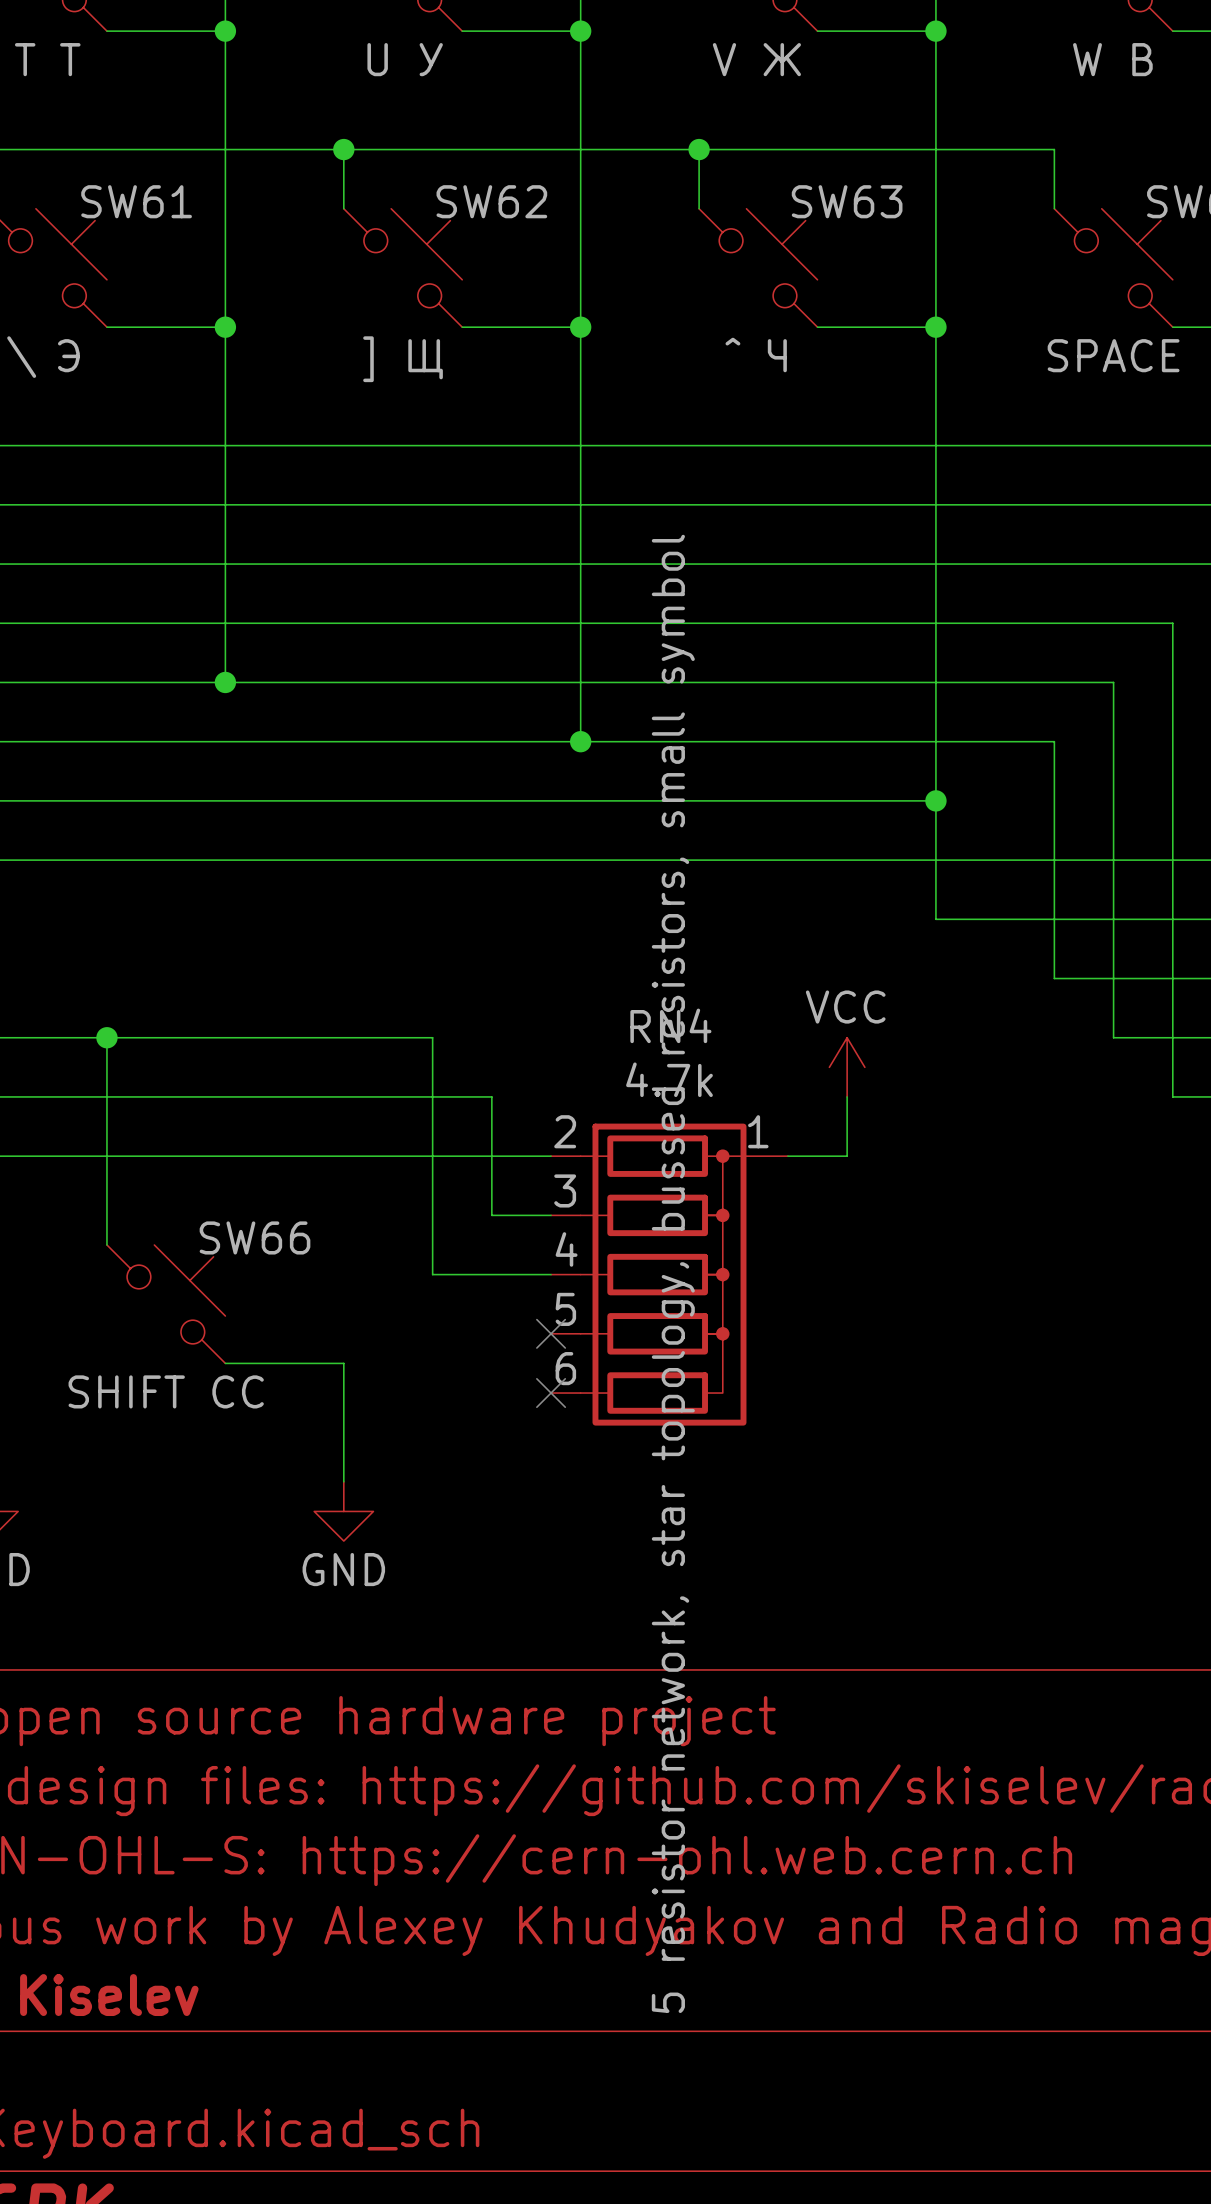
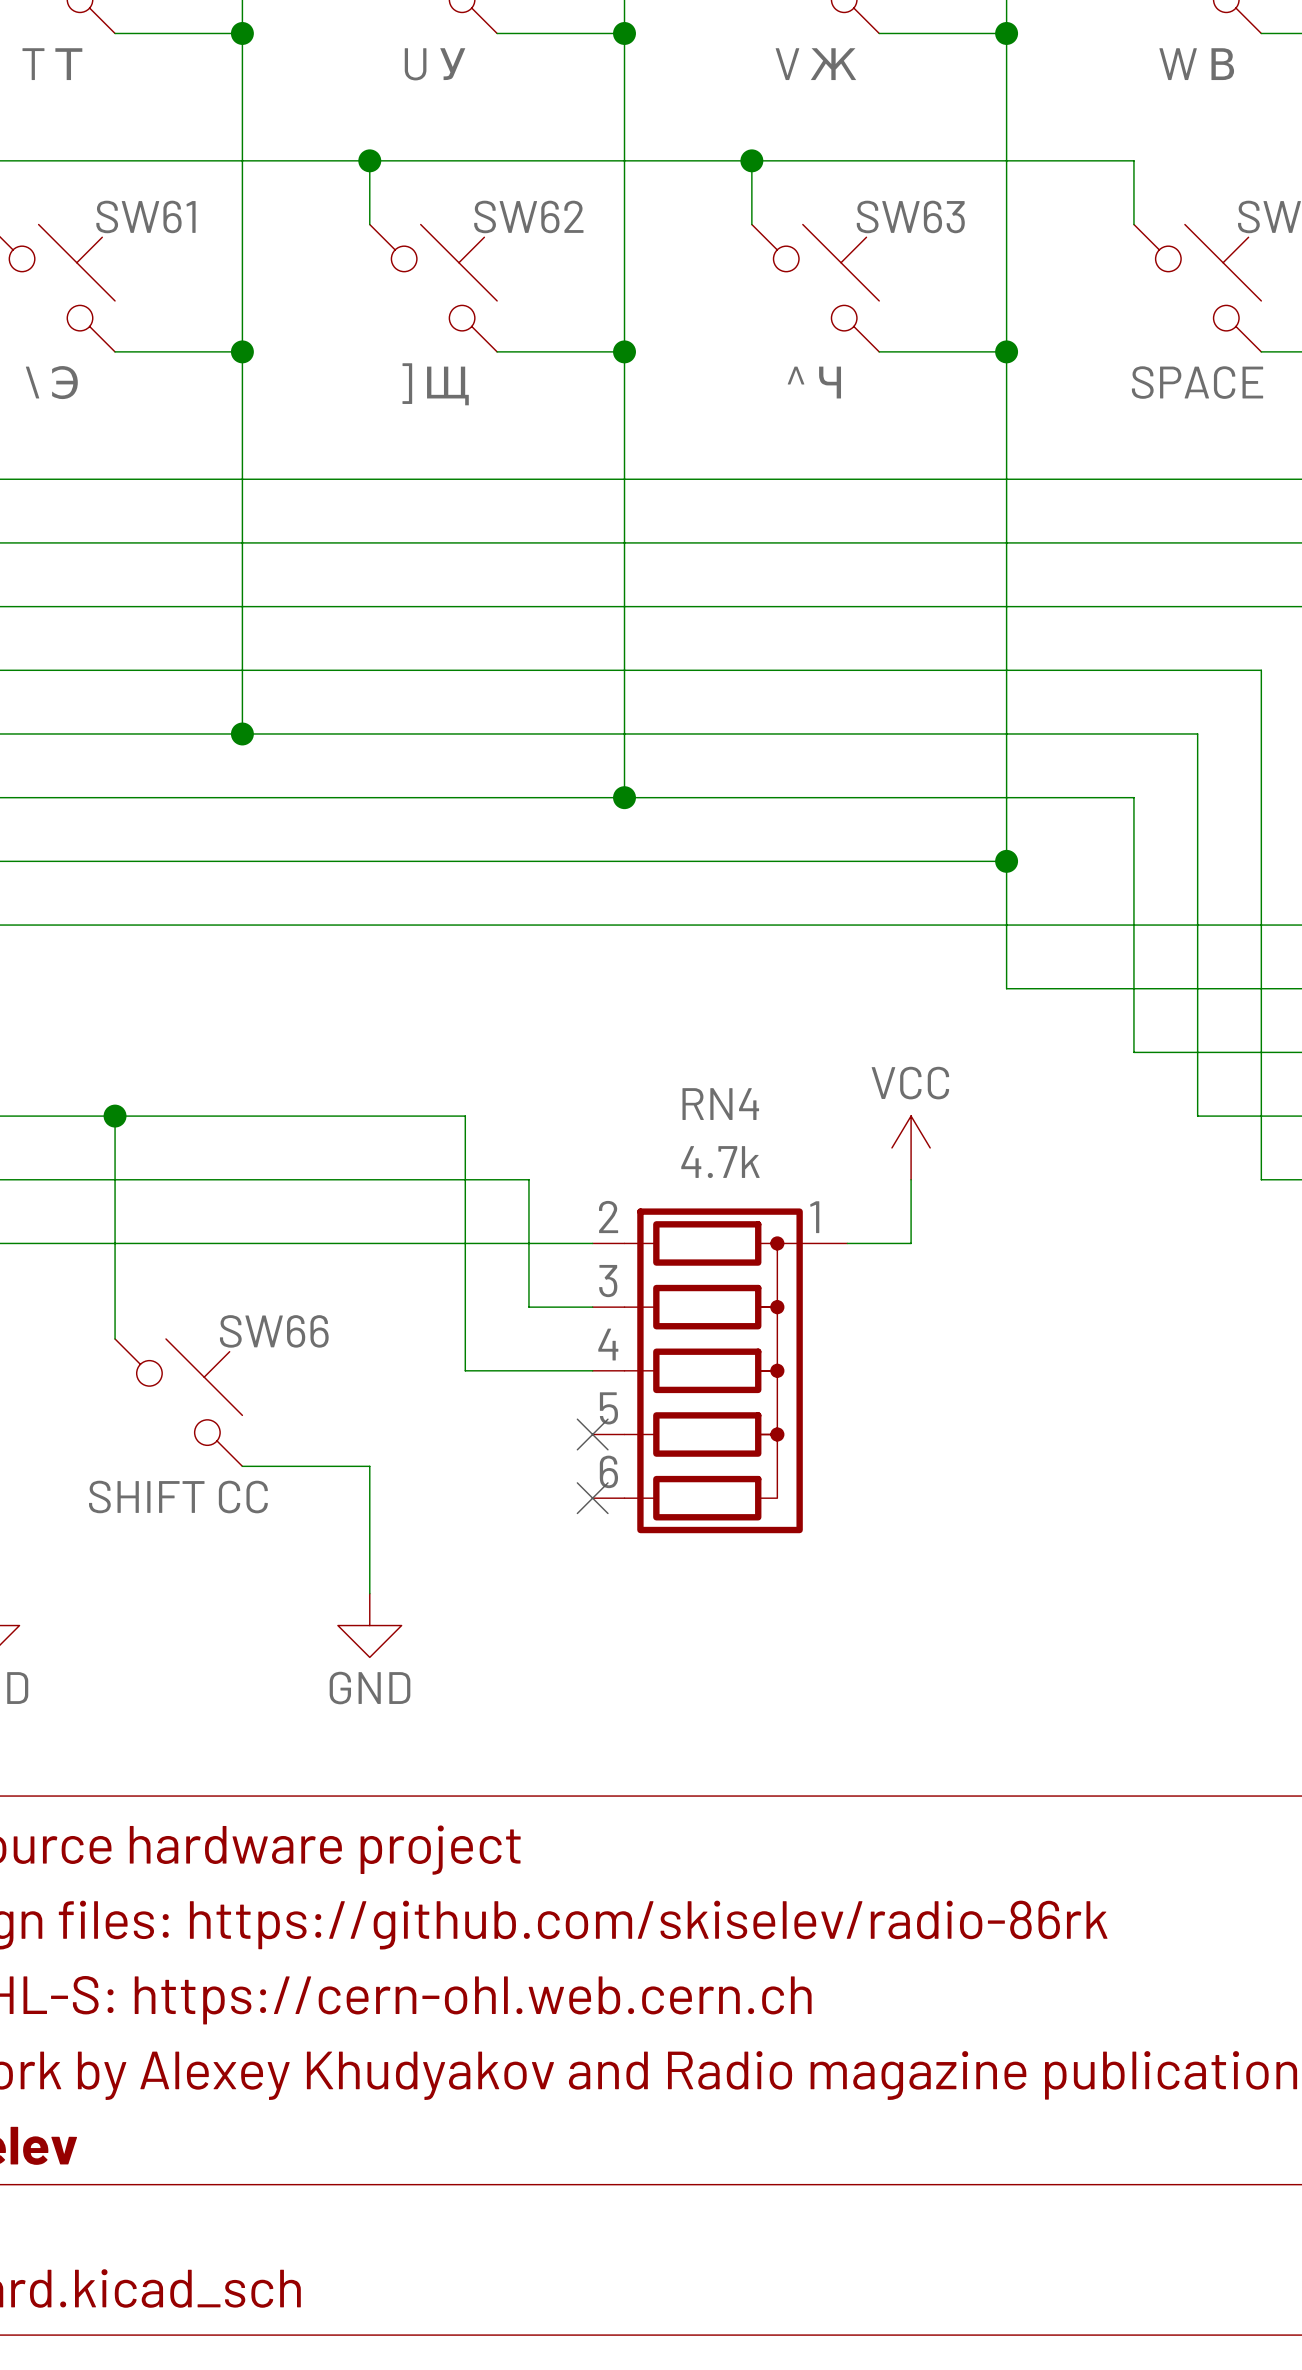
RN4 text: 5 resistor network, star topology, bussed resistors, small symbol (673, 1273) -> none

